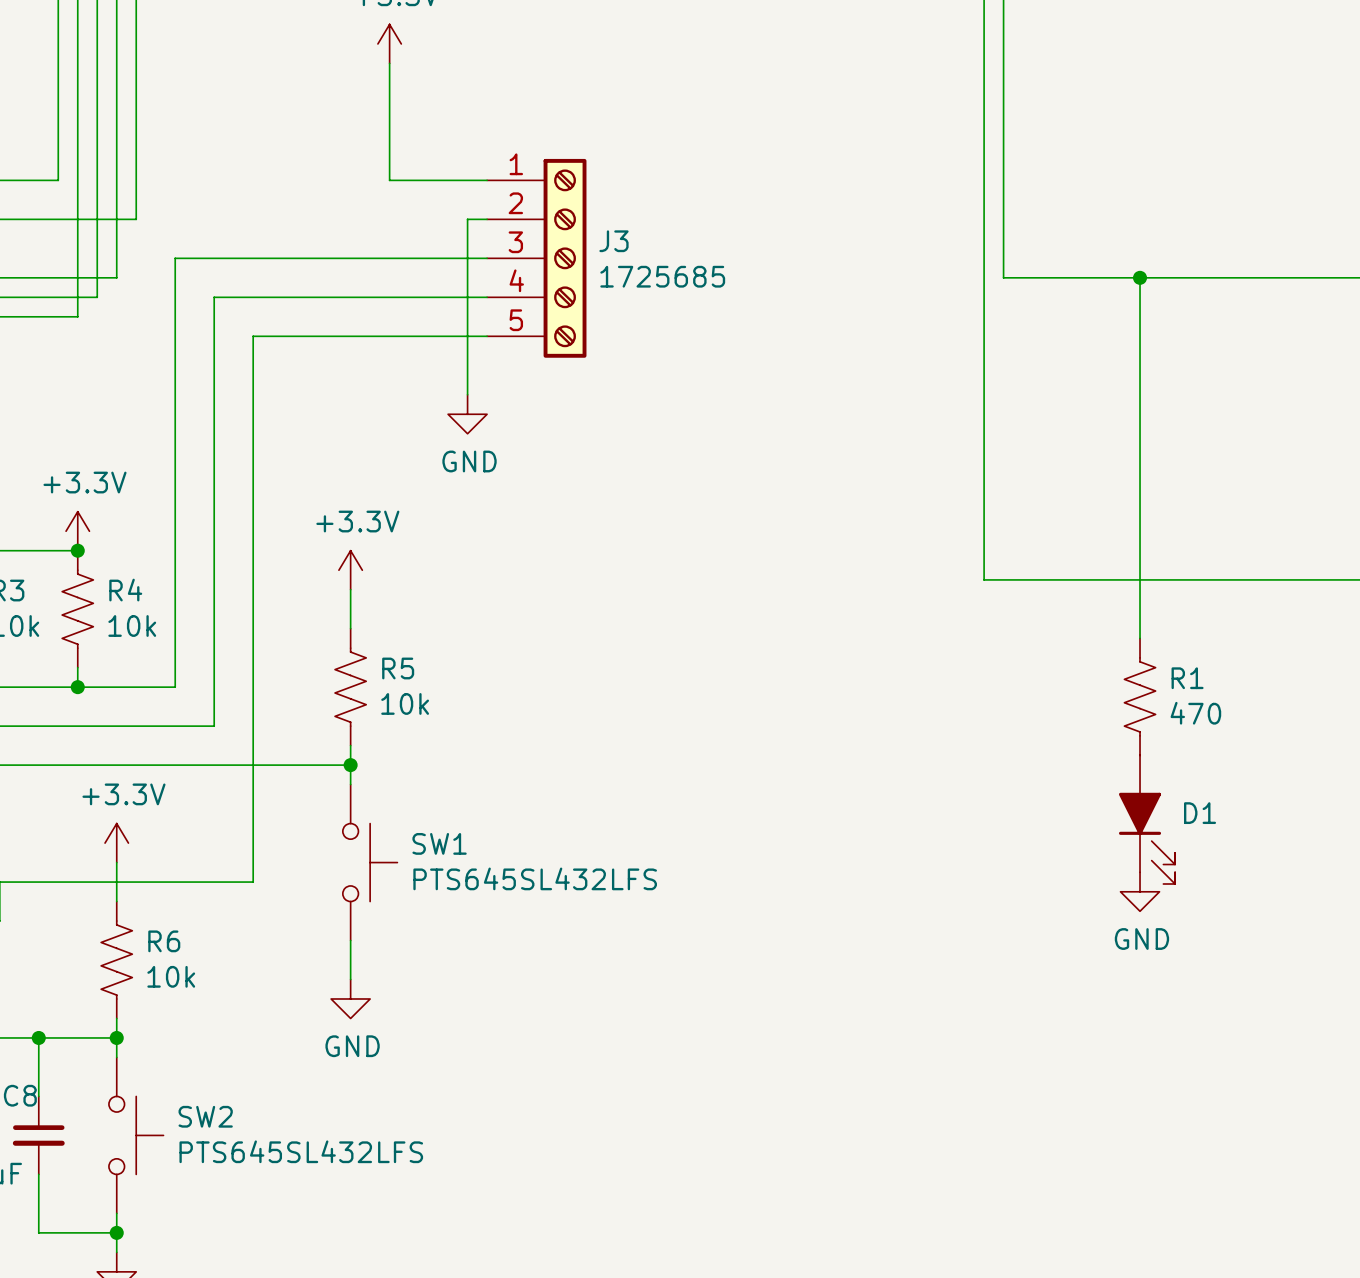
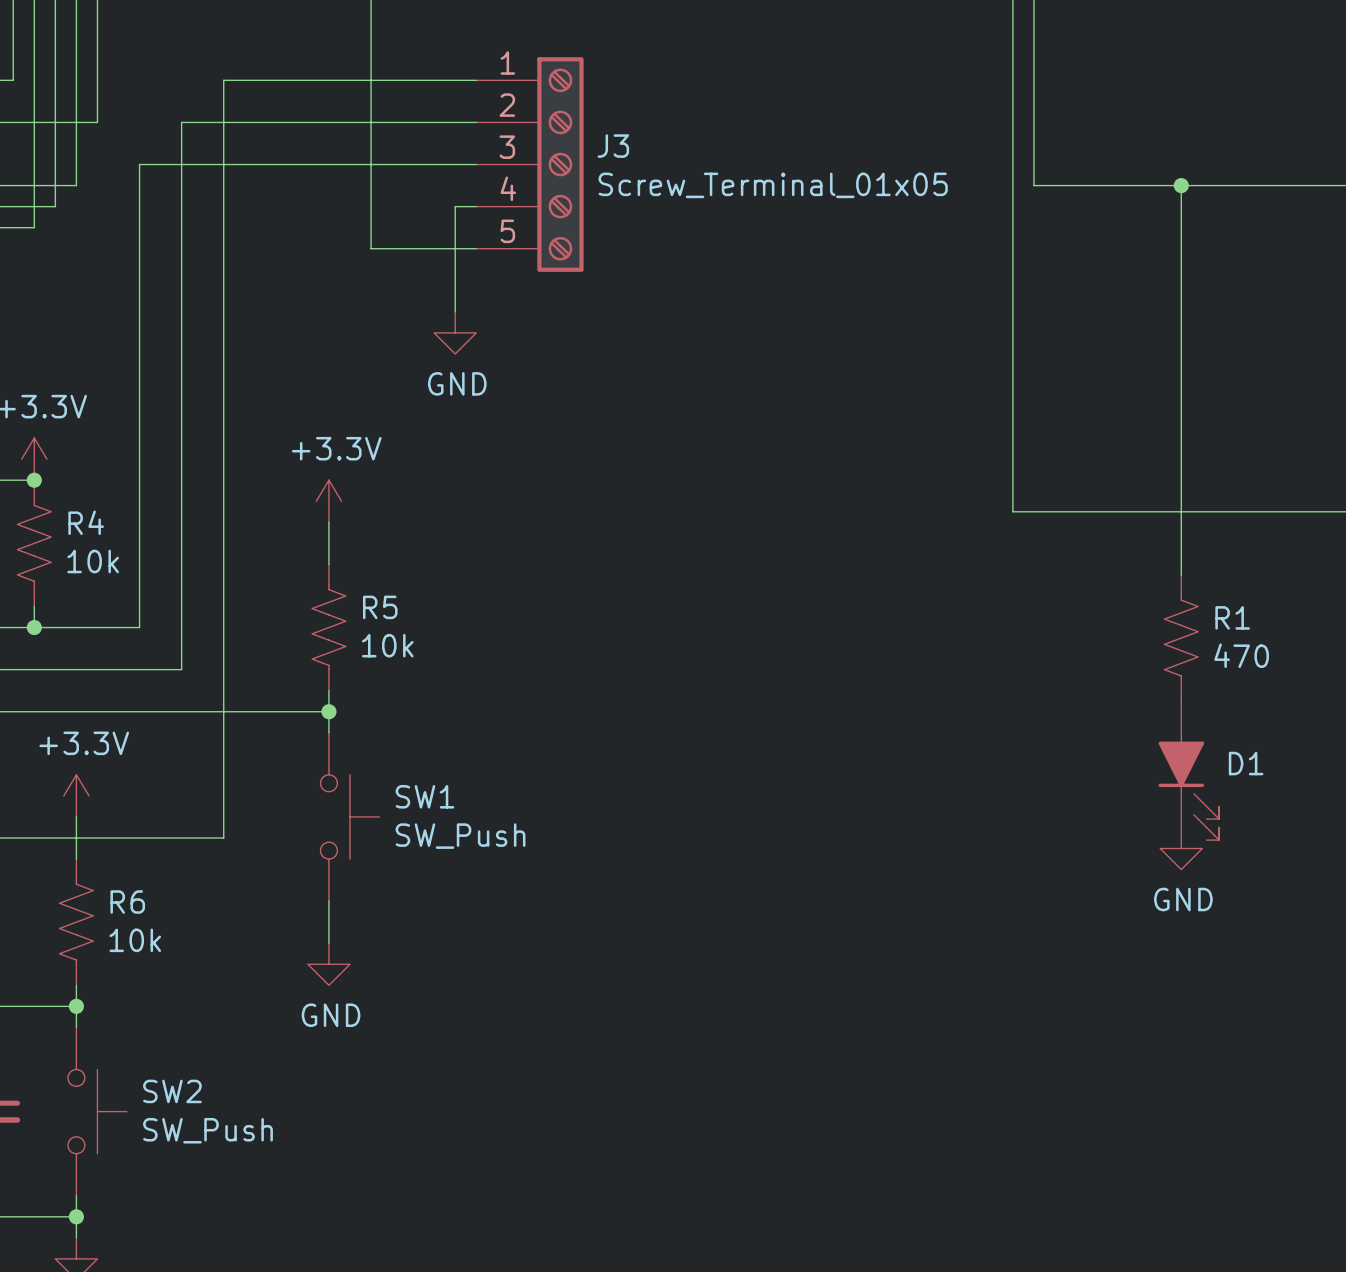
wire: (467, 219) (467, 297) (214, 297) -> (455, 122) (181, 122) (181, 206)
J3 value: 1725685 (662, 276) -> Screw_Terminal_01x05 (773, 185)
wire: (253, 336) (389, 336) -> (223, 248) (223, 80) (371, 80) (371, 248)
SW1 value: PTS645SL432LFS (535, 878) -> SW_Push (460, 836)
SW2 value: PTS645SL432LFS (301, 1151) -> SW_Push (208, 1130)

